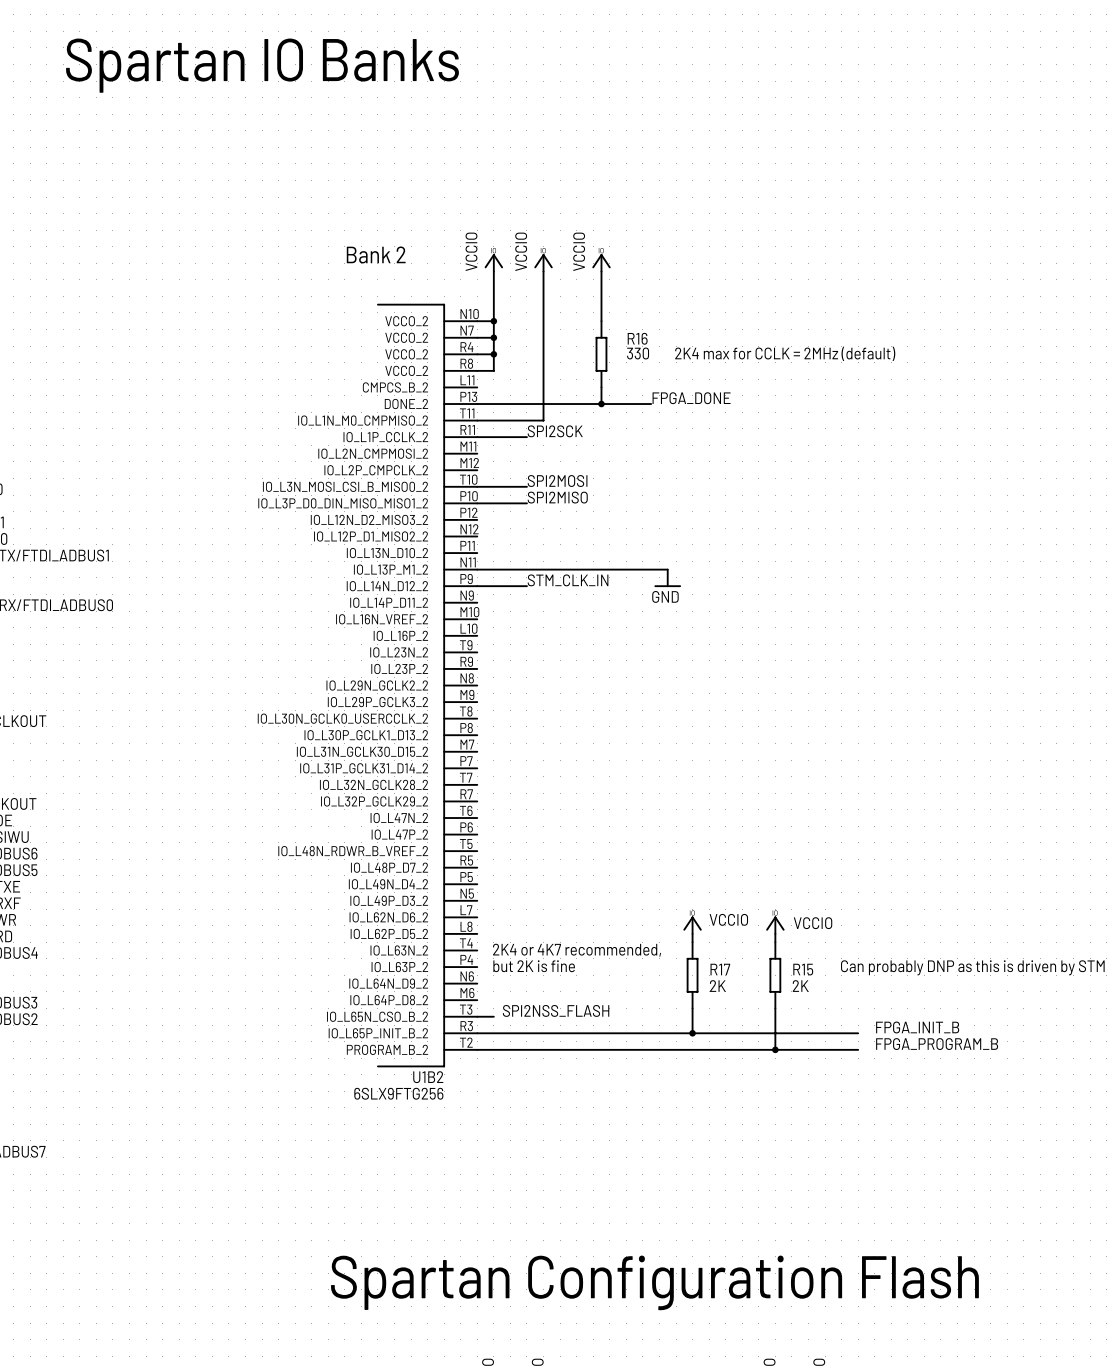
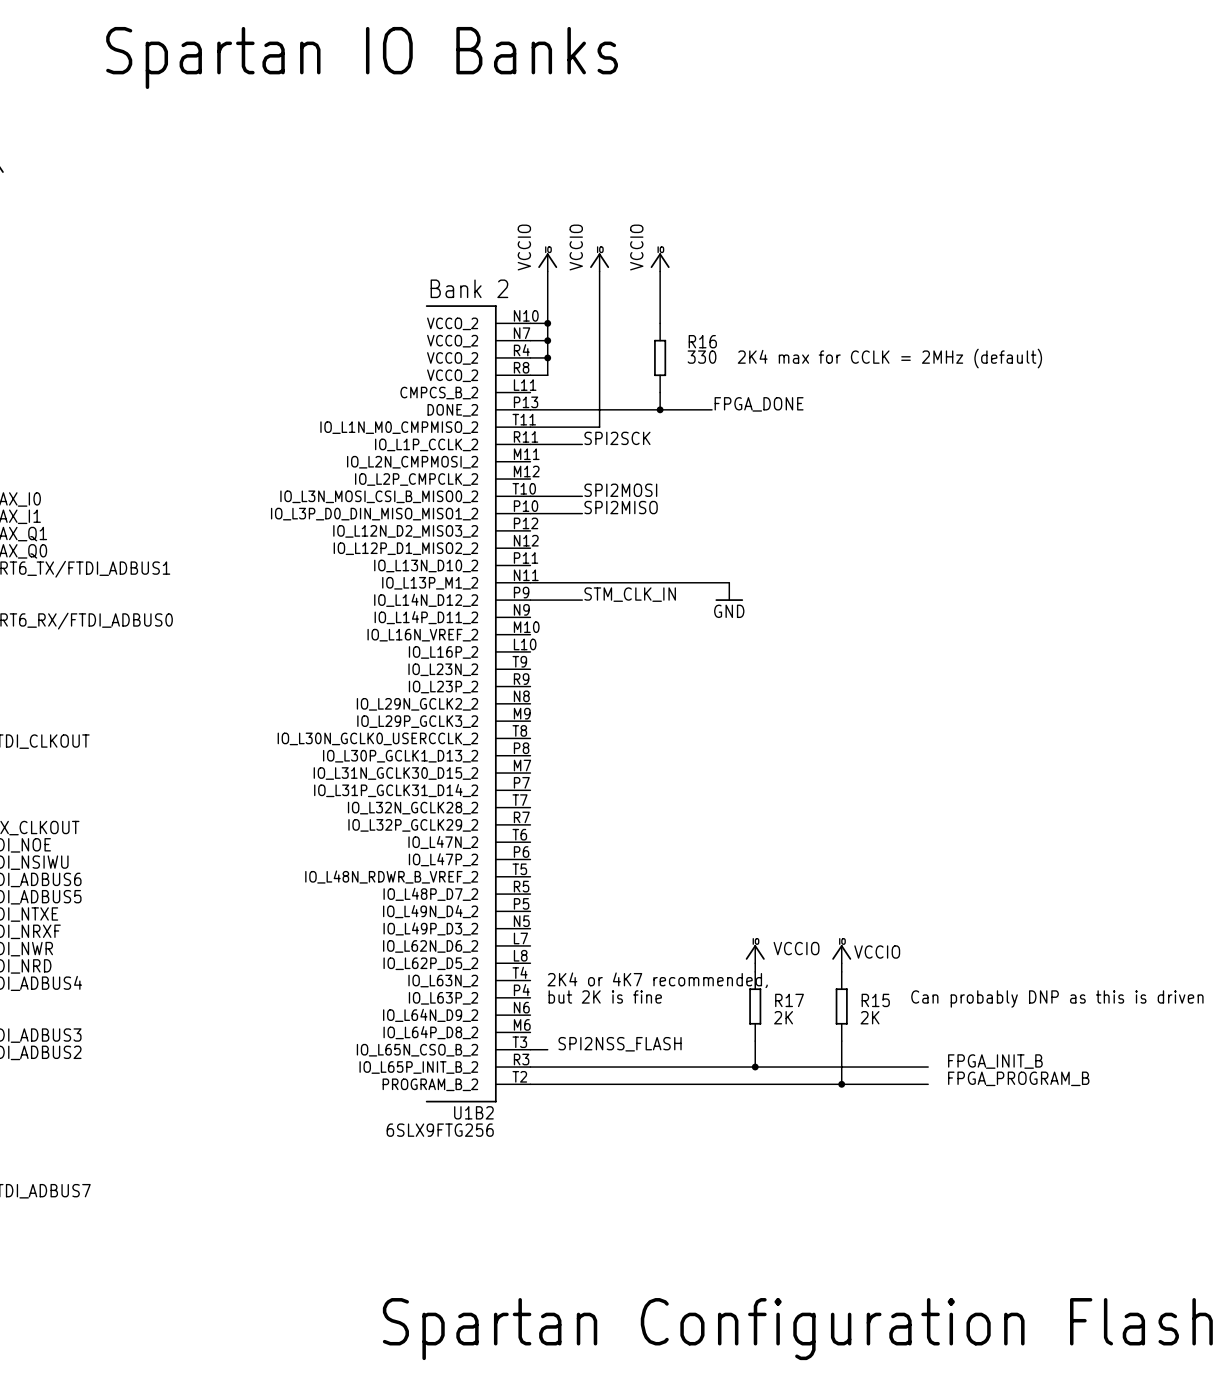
text position: Bank 2 (376, 254) -> Bank 2 (469, 288)

